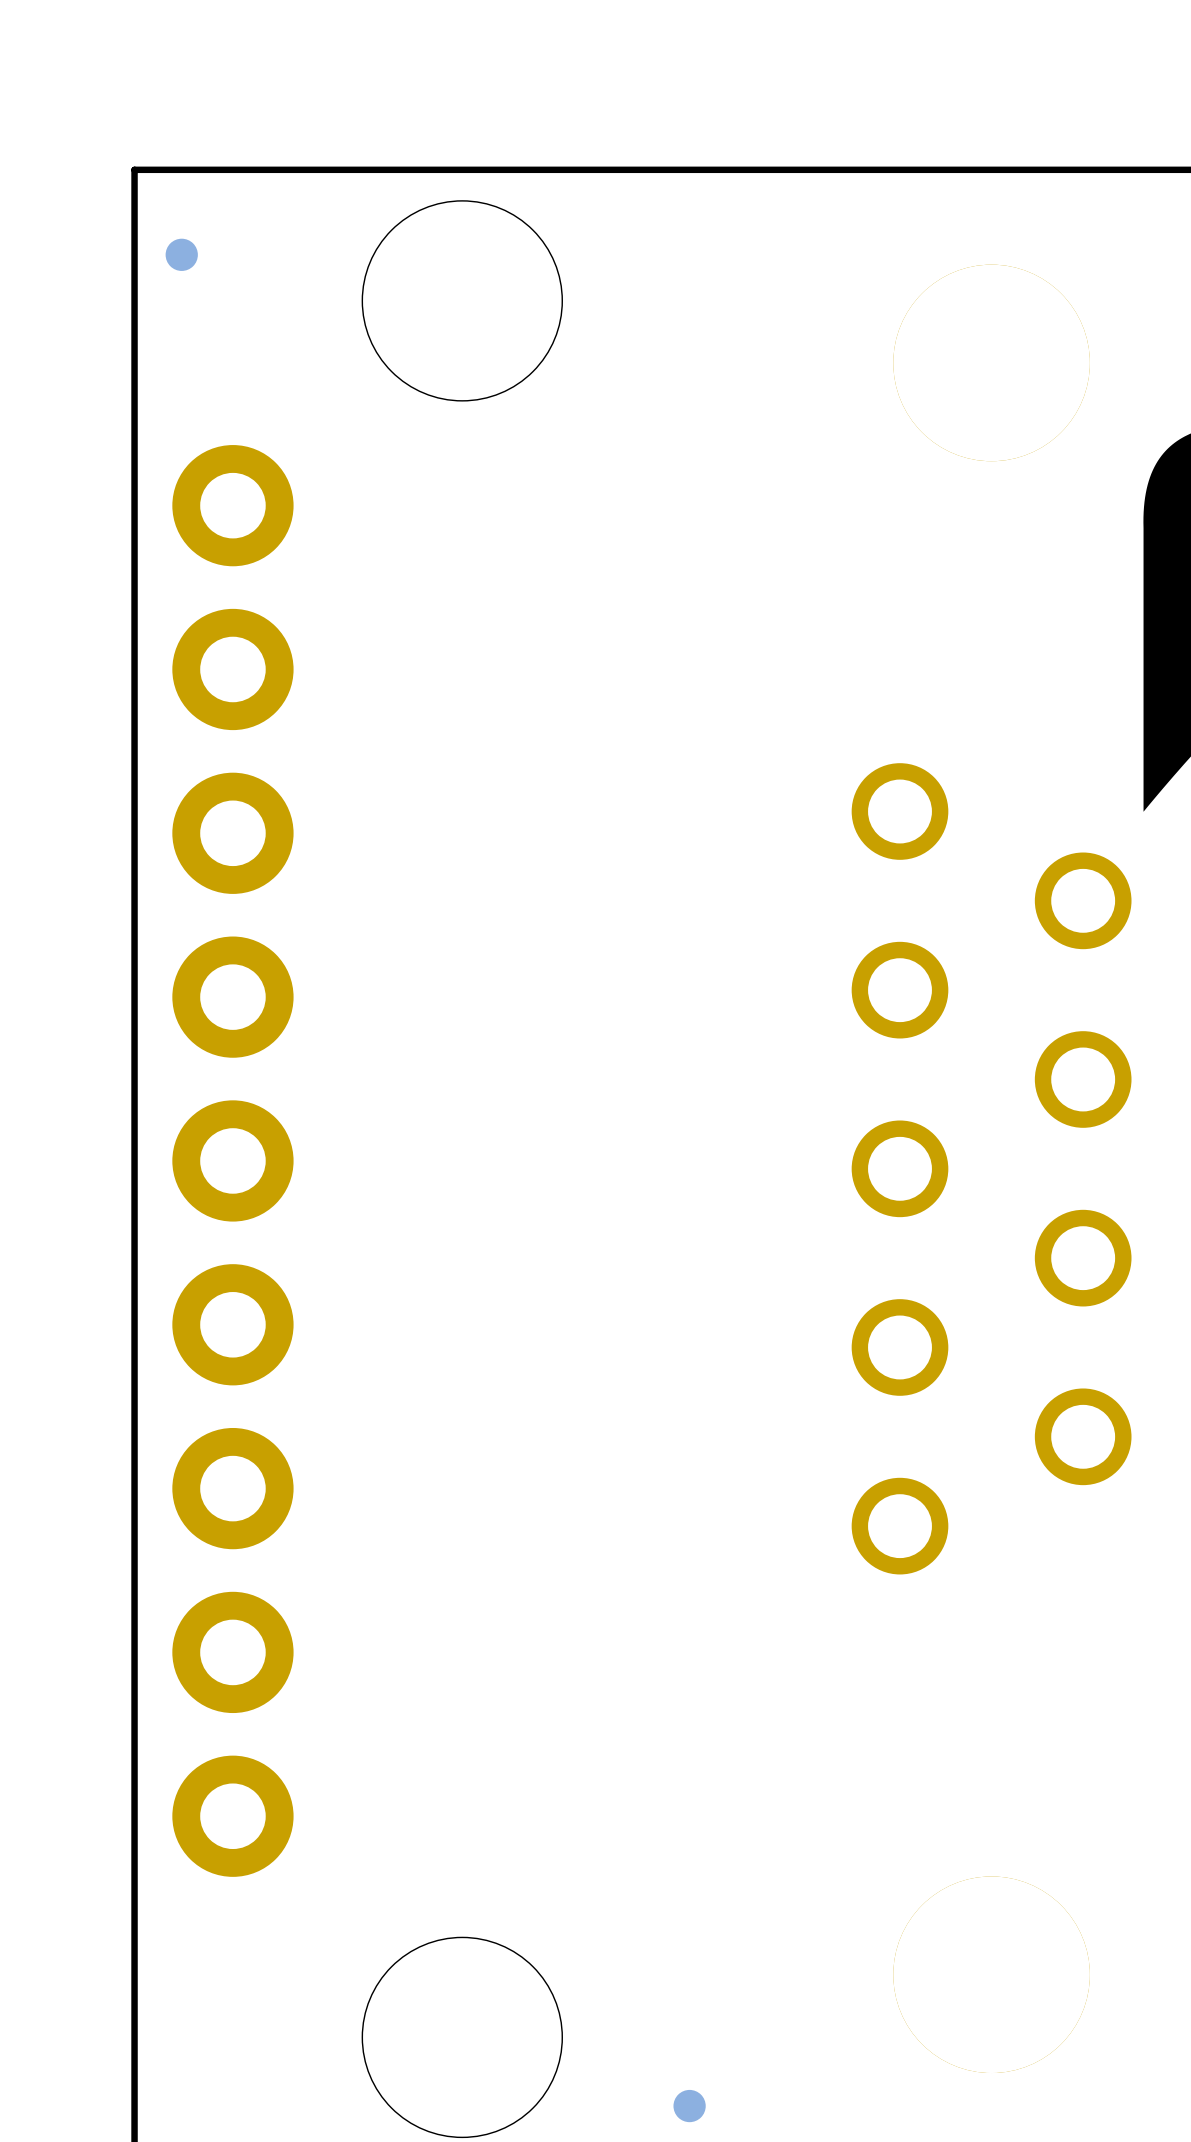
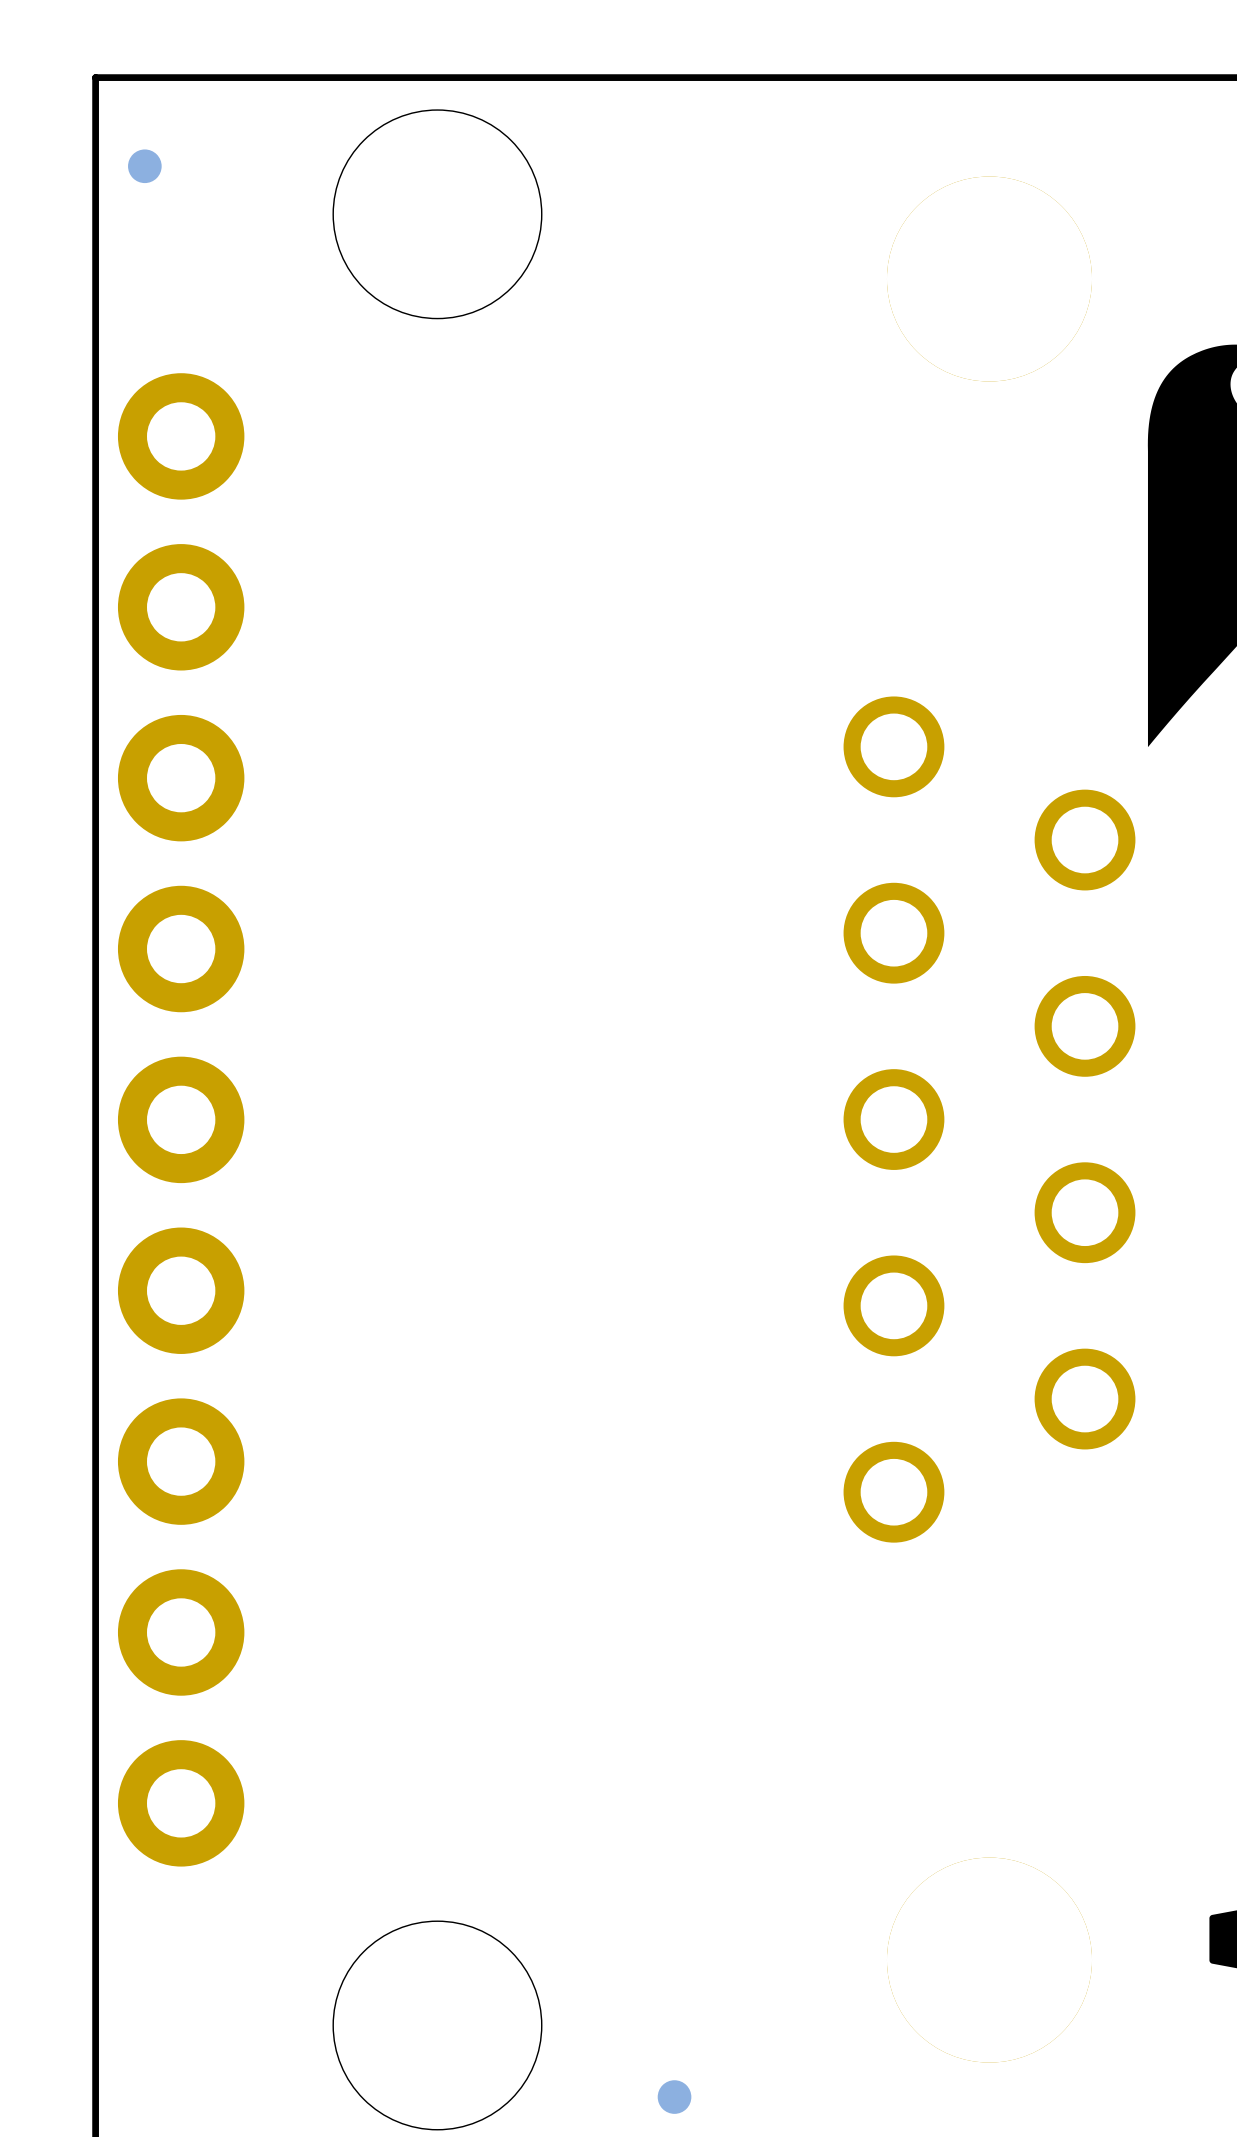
part position: (232, 1160) -> (181, 1119)

